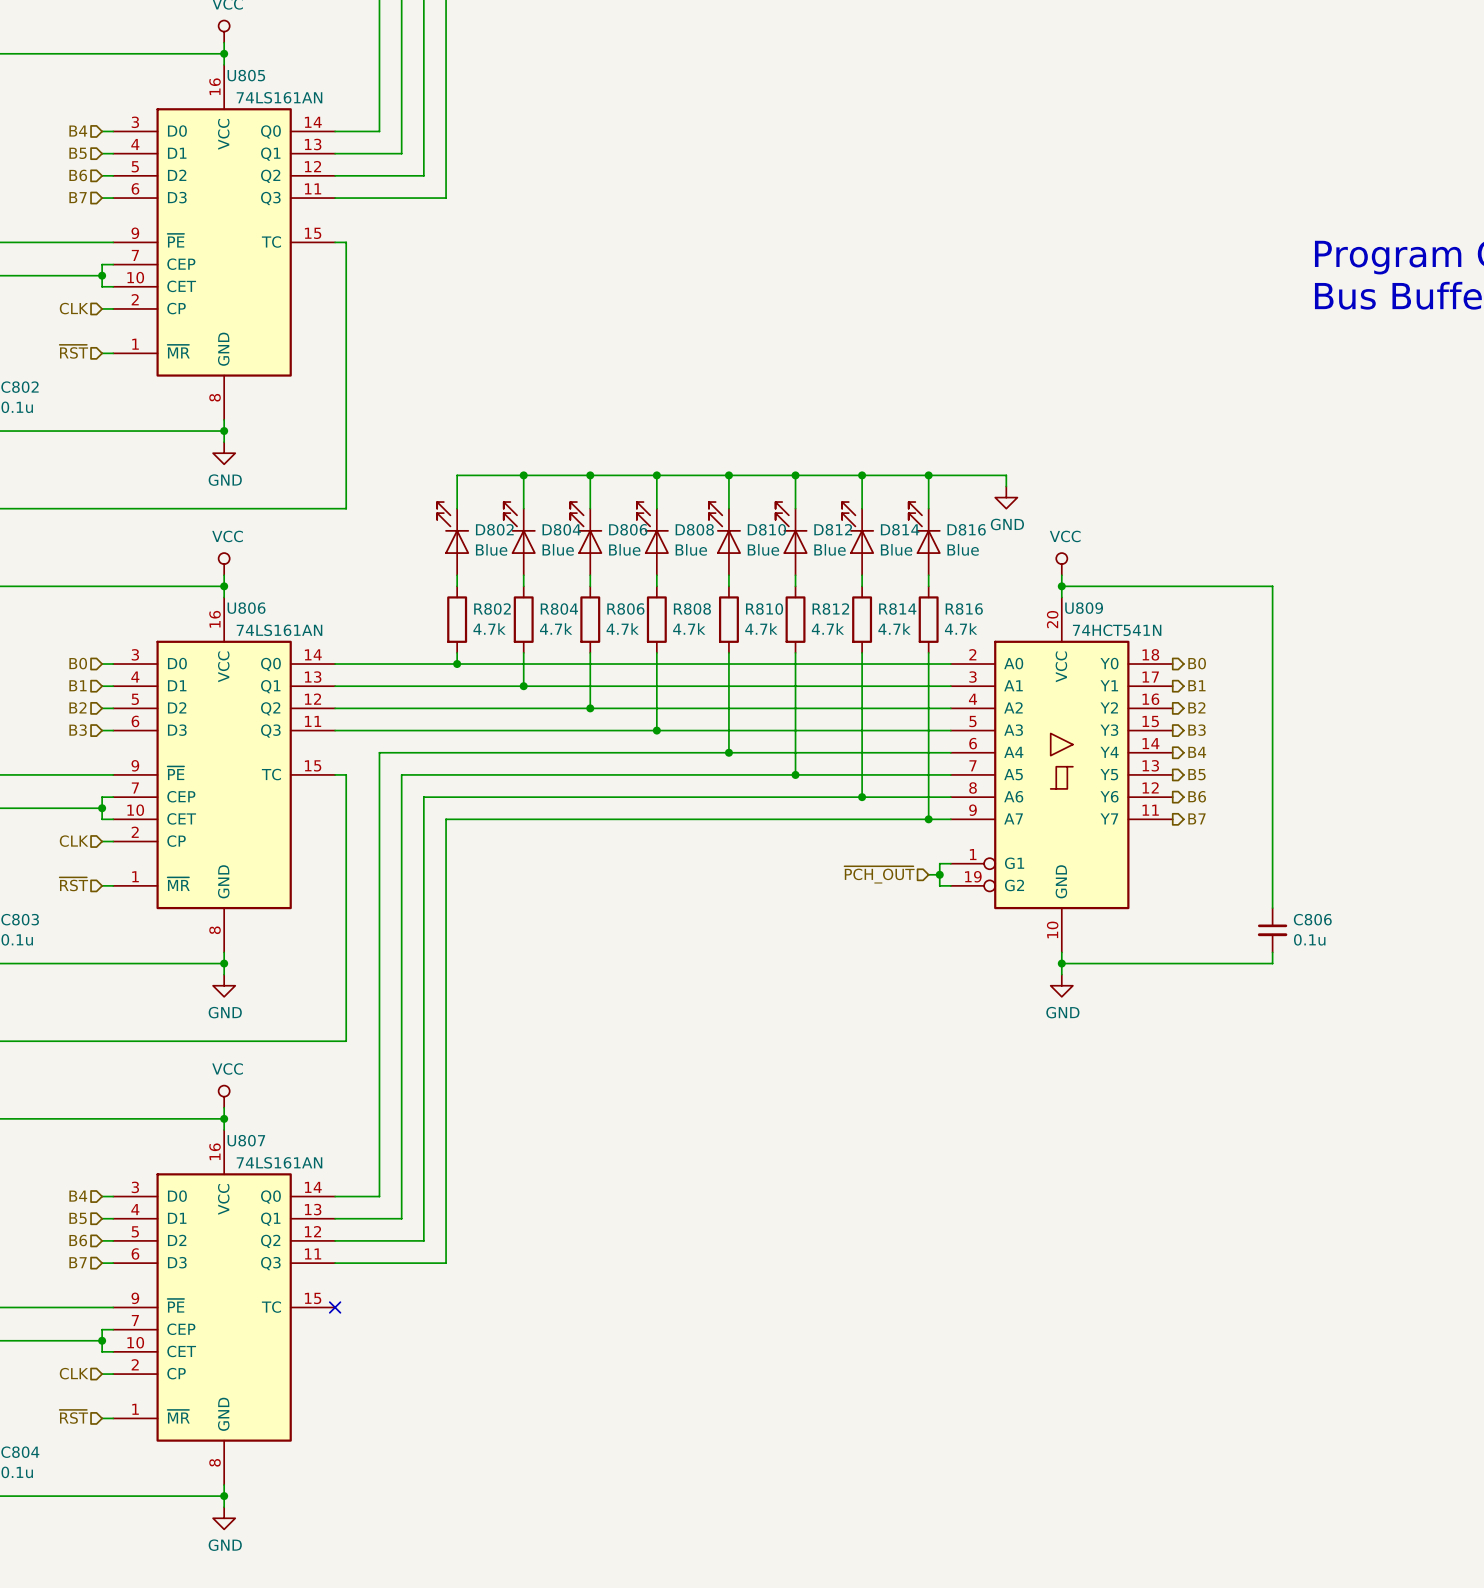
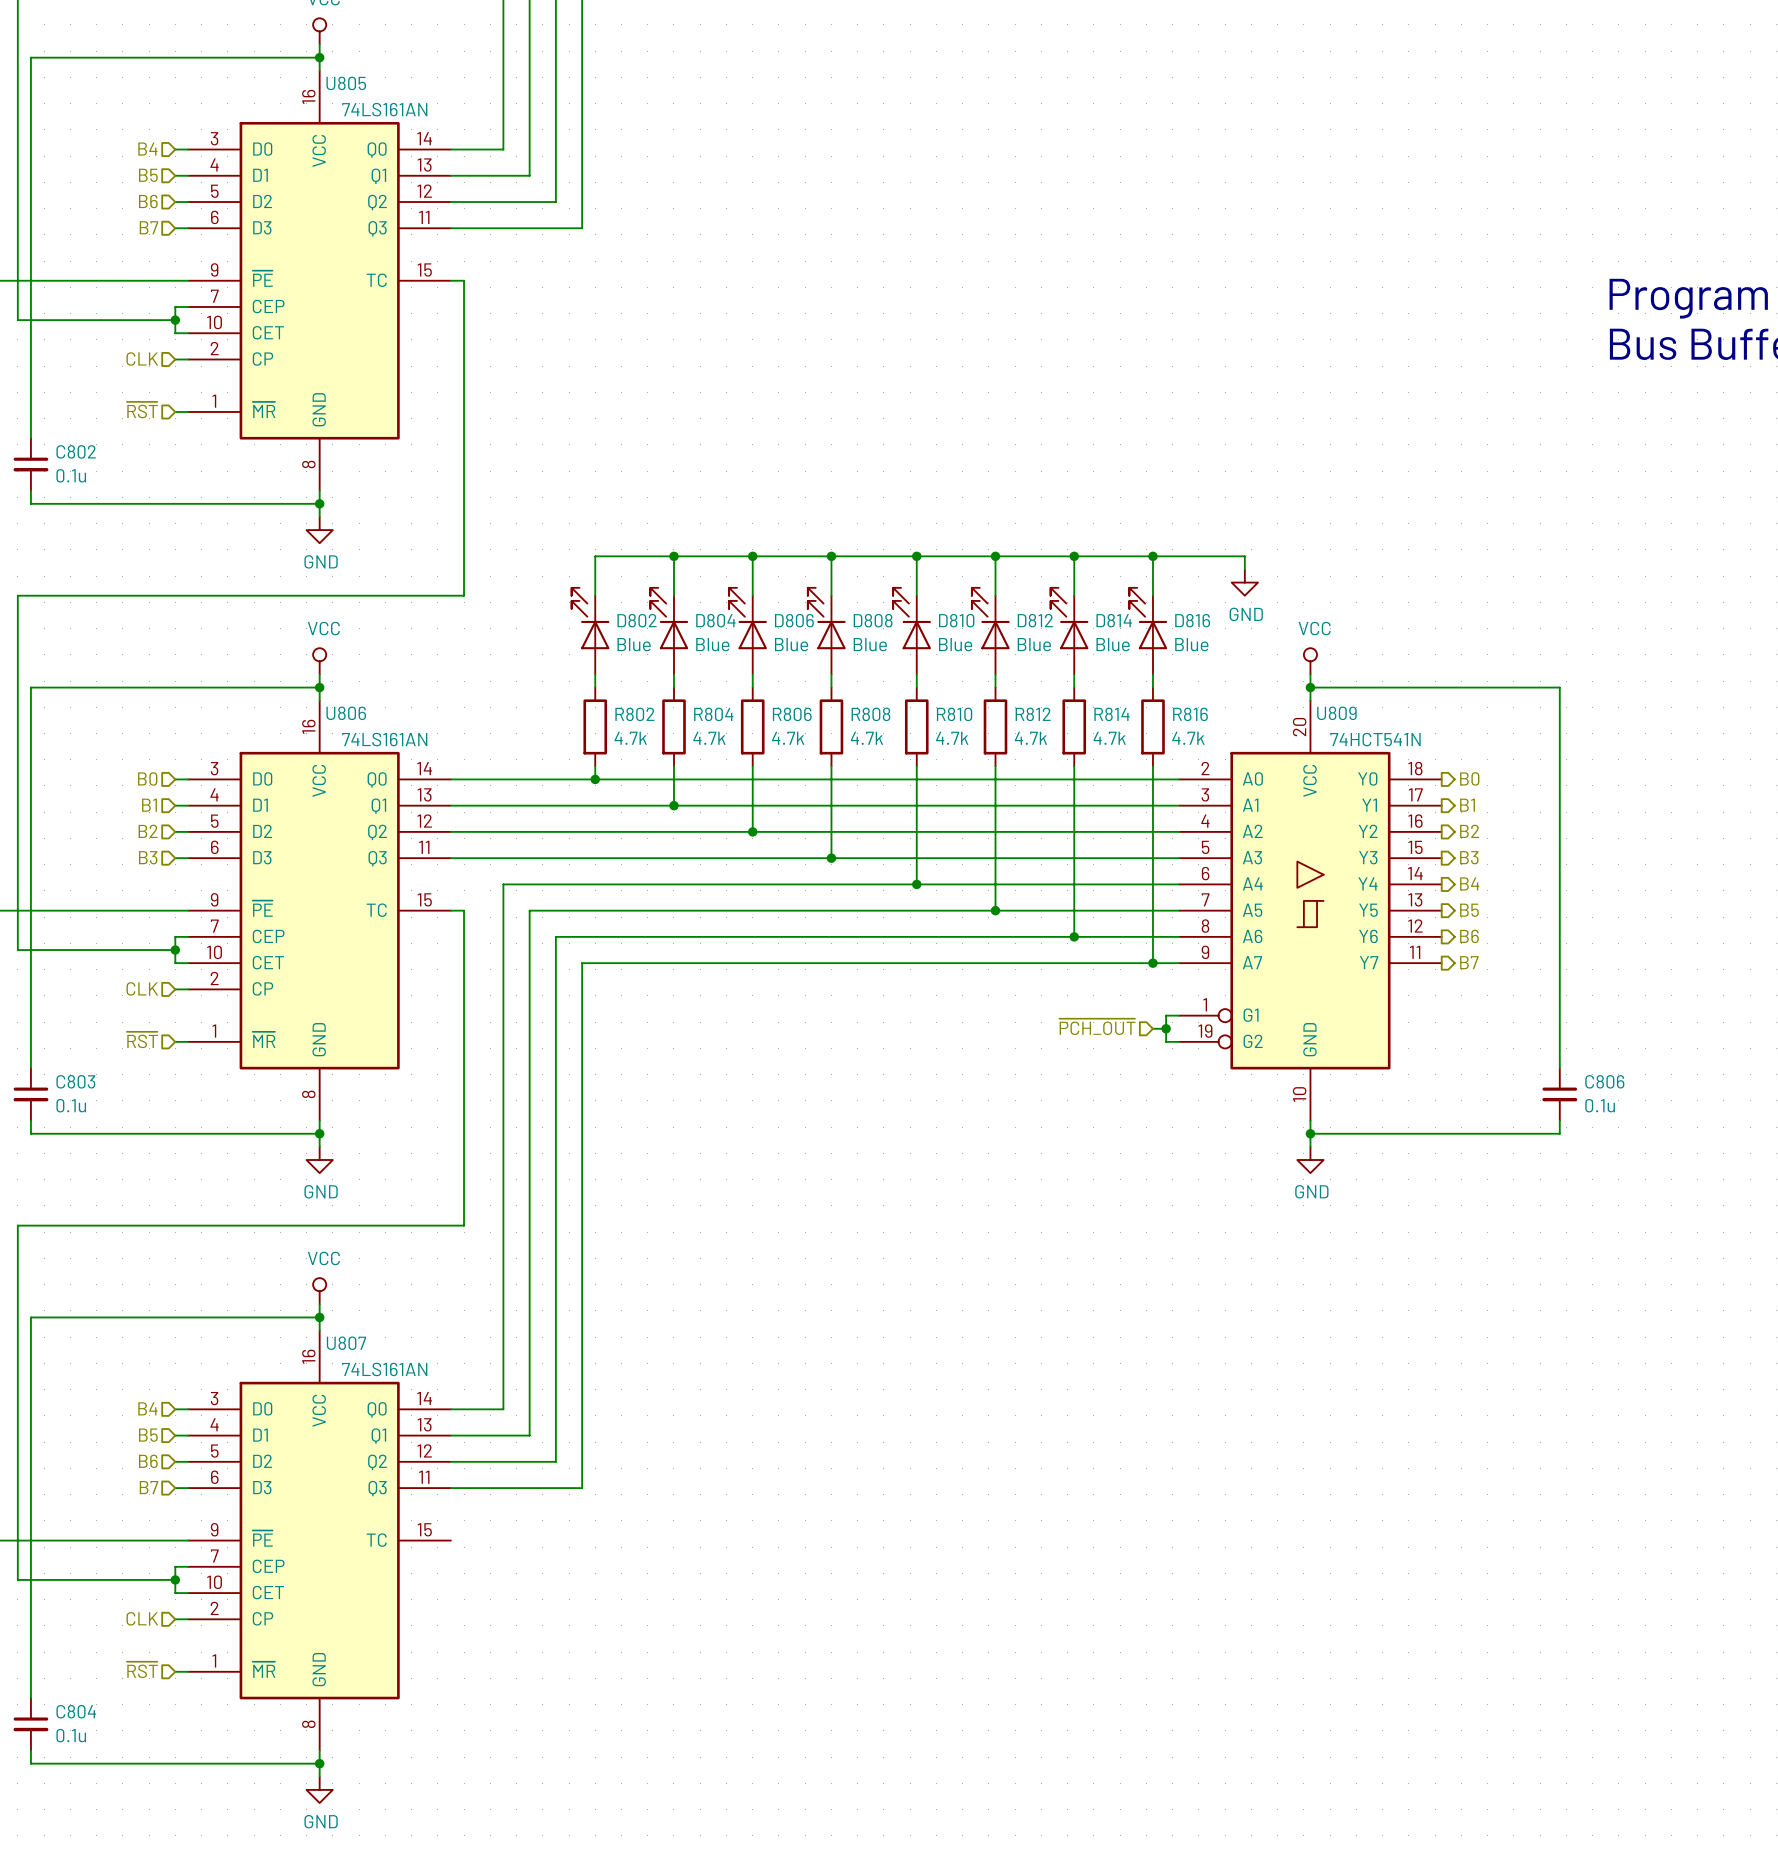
no-connect mark: (335, 1307) -> none

